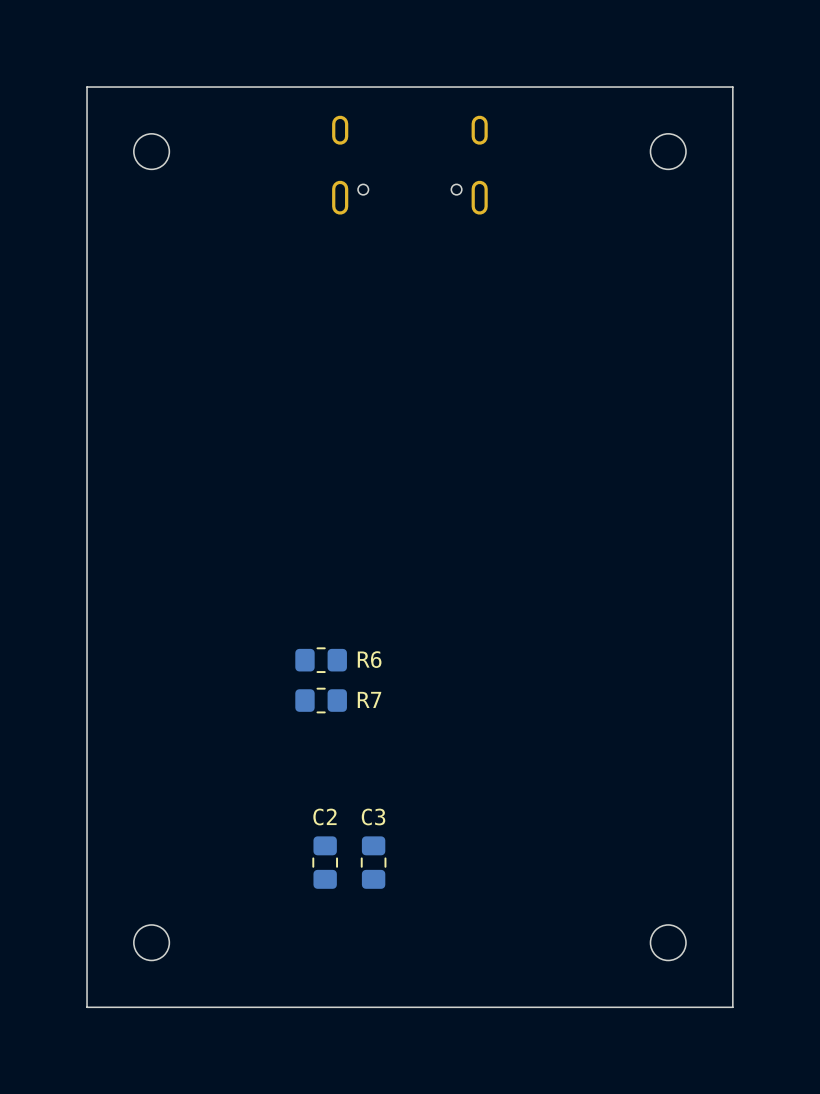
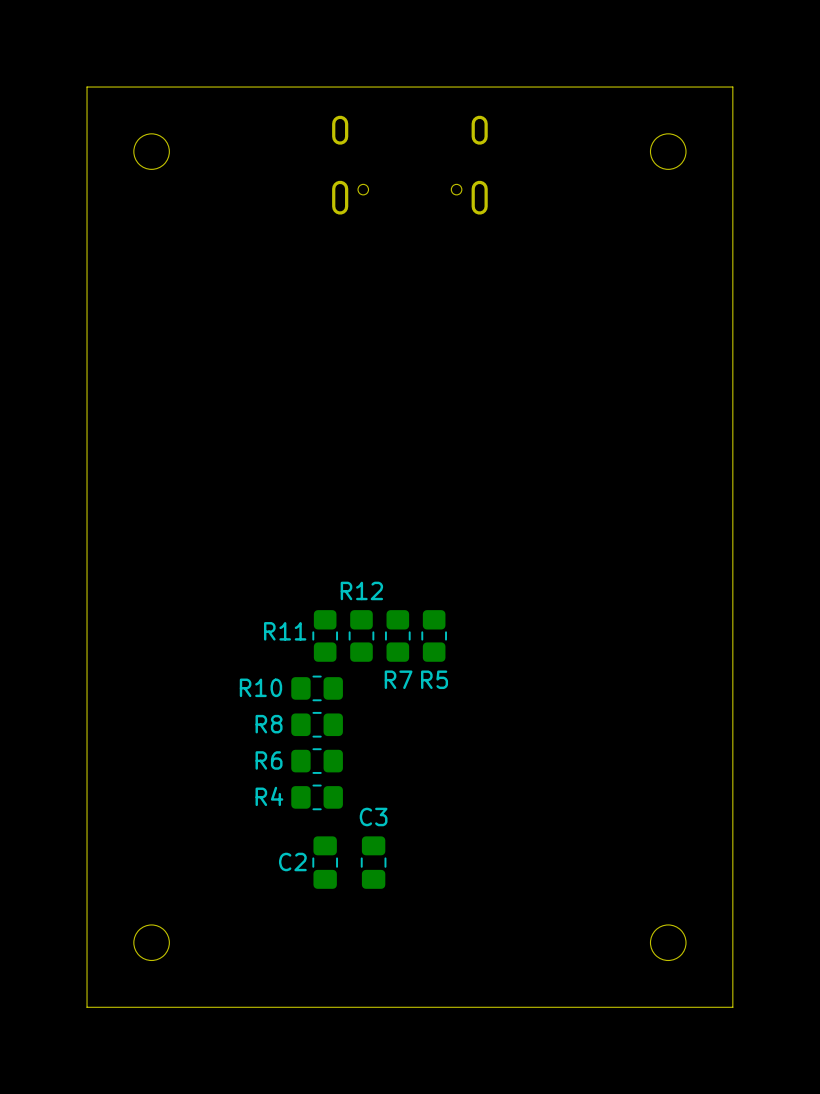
R11: none -> (325, 635)
R12: none -> (361, 635)
R5: none -> (434, 635)
R6 name position: R6 (369, 659) -> R6 (269, 760)
R6 position: (321, 660) -> (317, 761)
R10: none -> (317, 688)
R7 rotation: 0° (321, 700) -> 90° clockwise (397, 635)
R7 position: (321, 700) -> (397, 635)
R8: none -> (317, 724)
R4: none -> (317, 797)
C2 name position: C2 (324, 817) -> C2 (292, 861)

